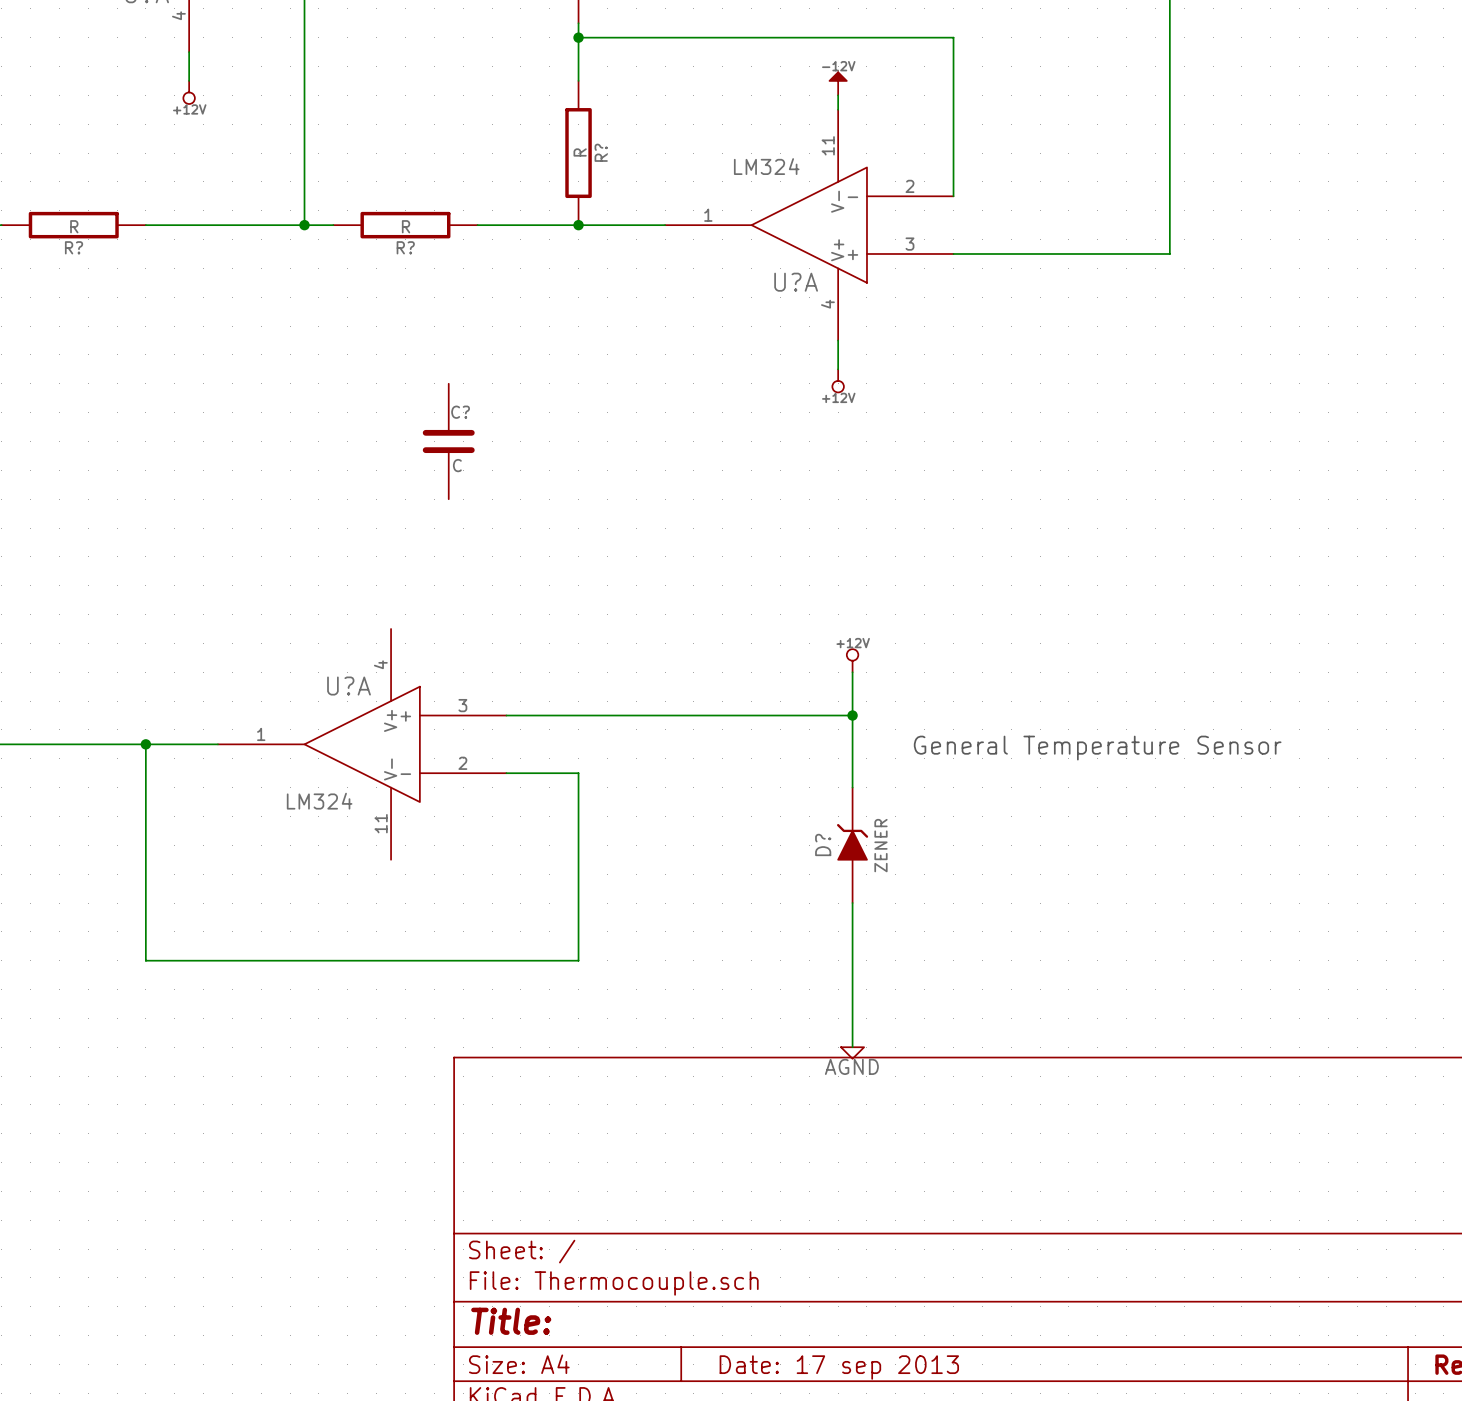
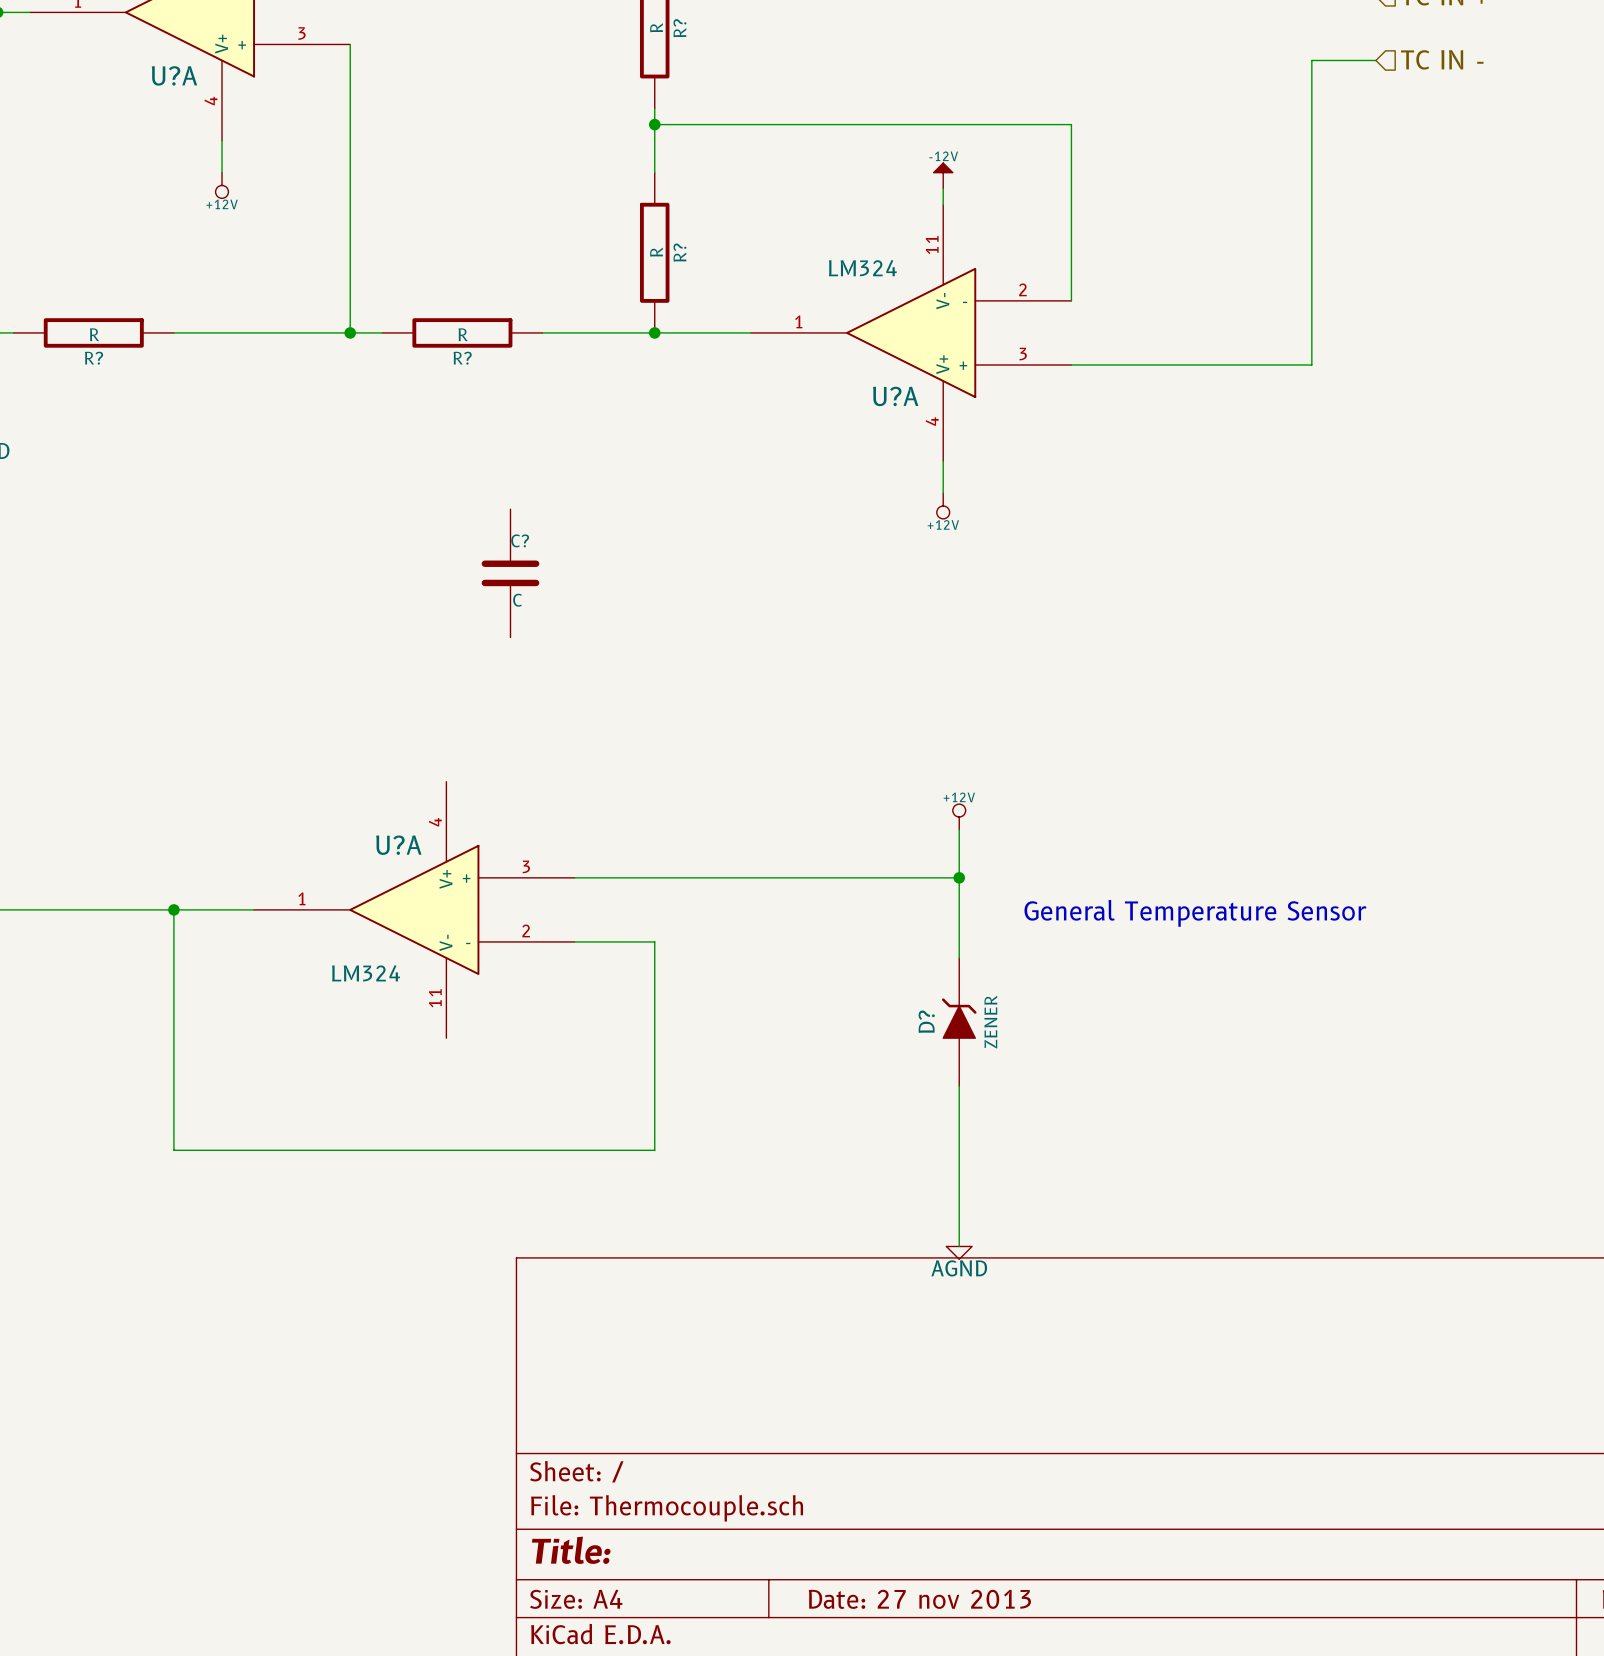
title block: Date: 17 sep 2013 (839, 1367) -> Date: 27 nov 2013 (919, 1599)

